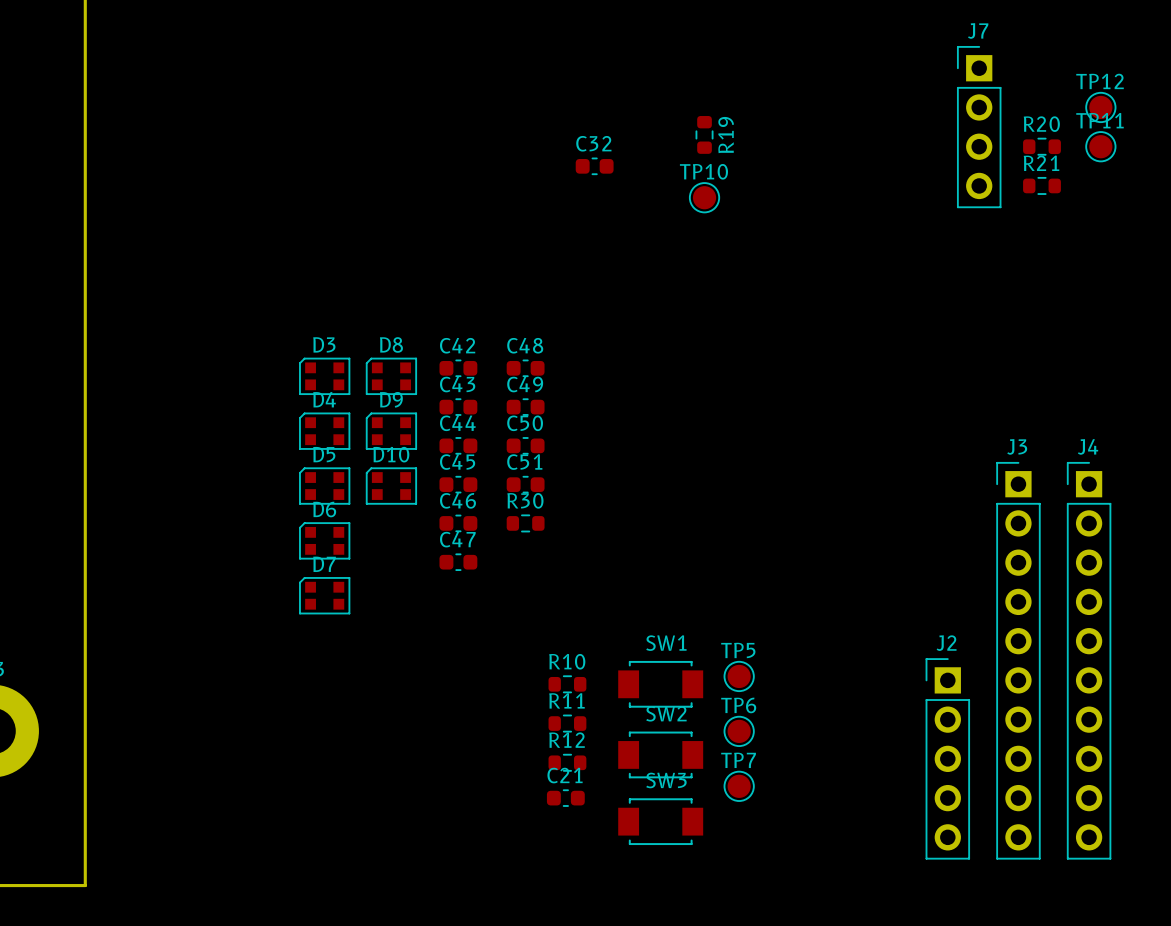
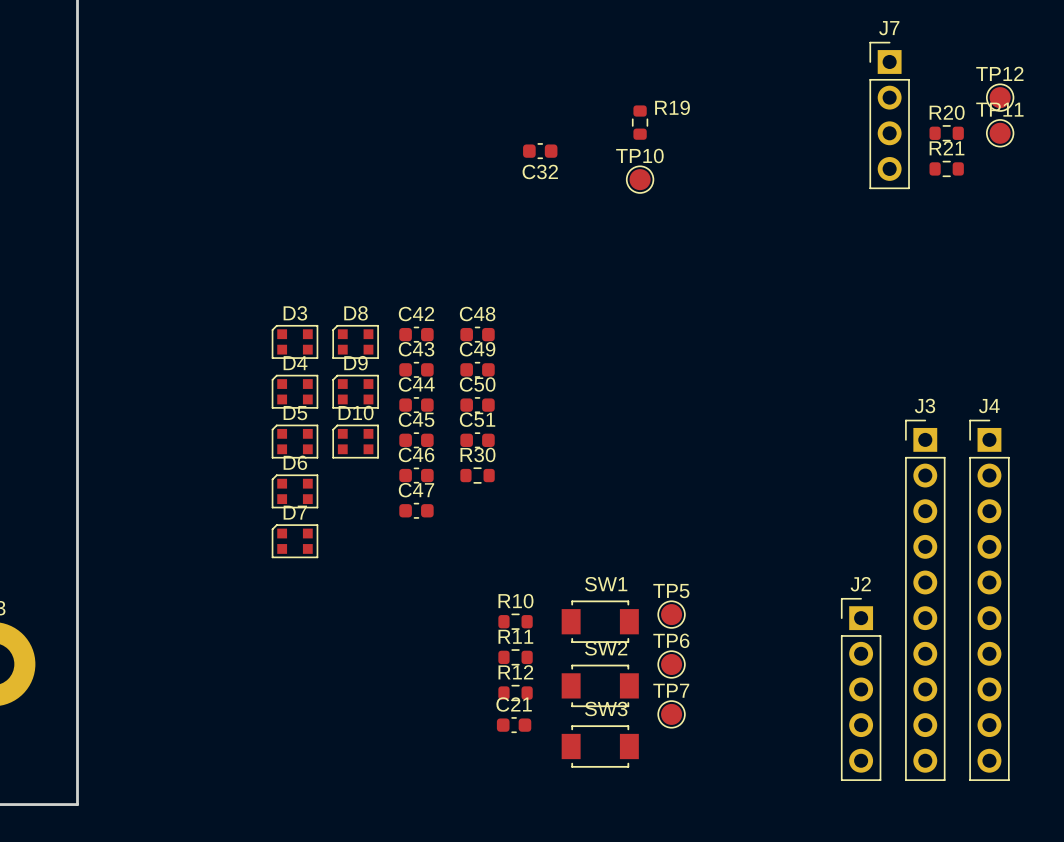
R19 name rotation: 0° (726, 135) -> 90° clockwise (672, 107)
C32 name position: C32 (593, 143) -> C32 (540, 171)

